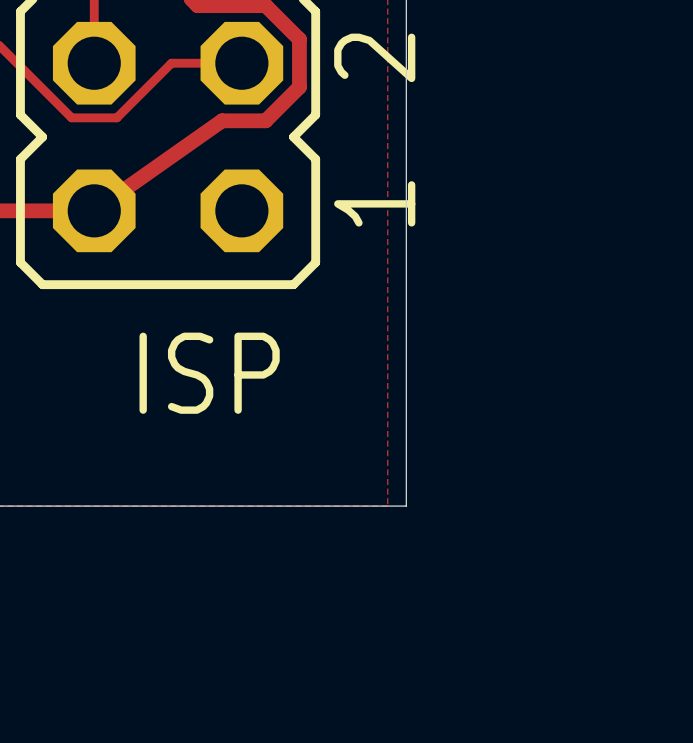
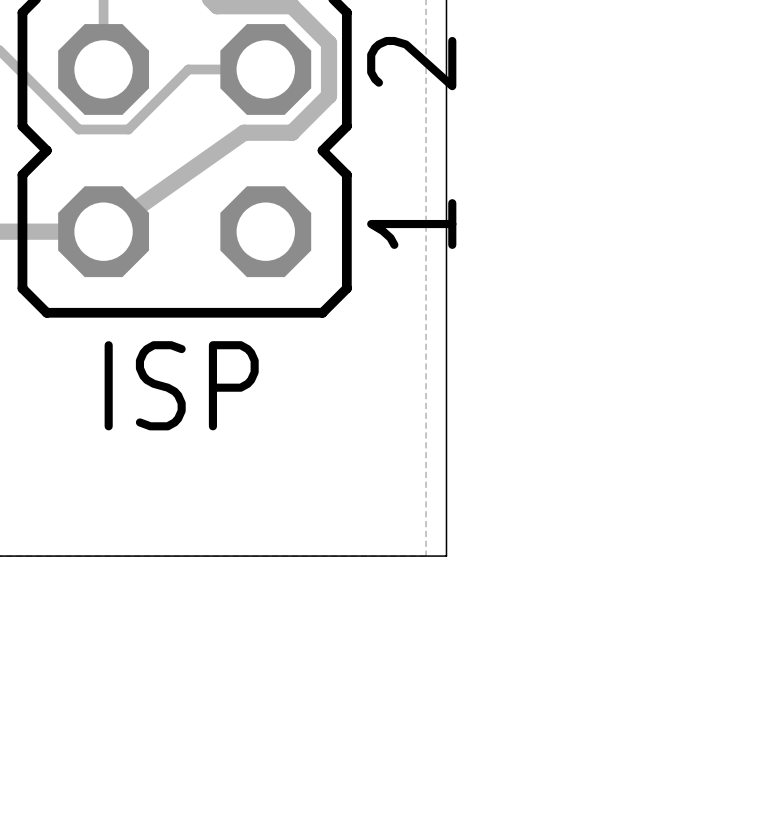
ISP name position: ISP (209, 373) -> ISP (181, 385)

